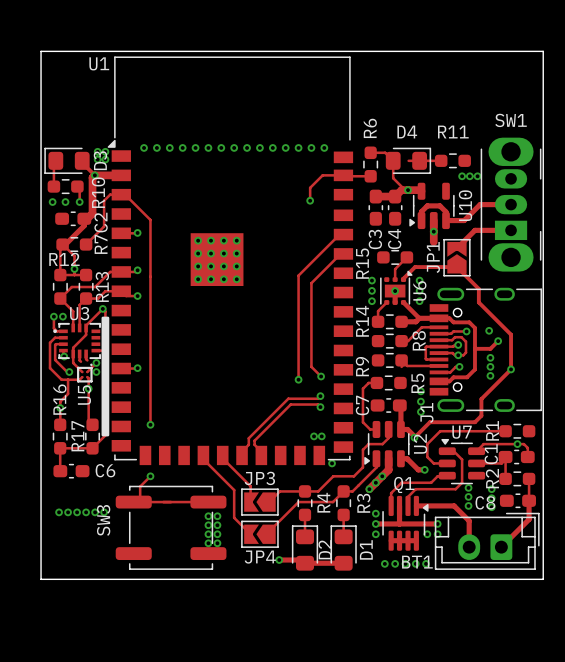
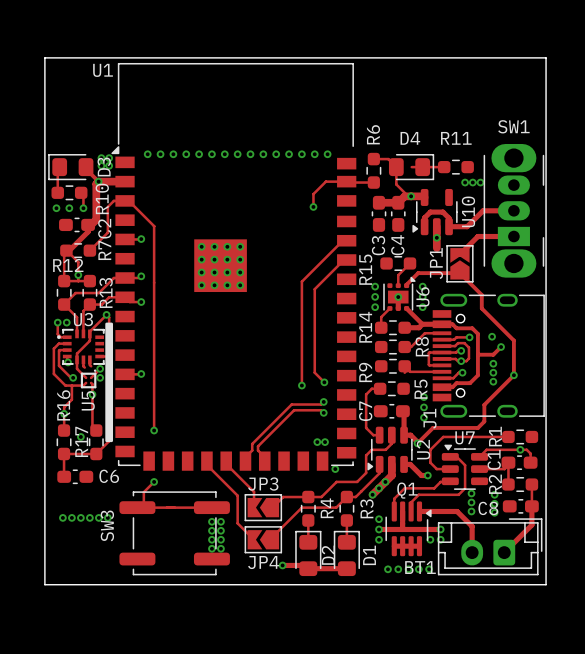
via: none -> (80, 436)

